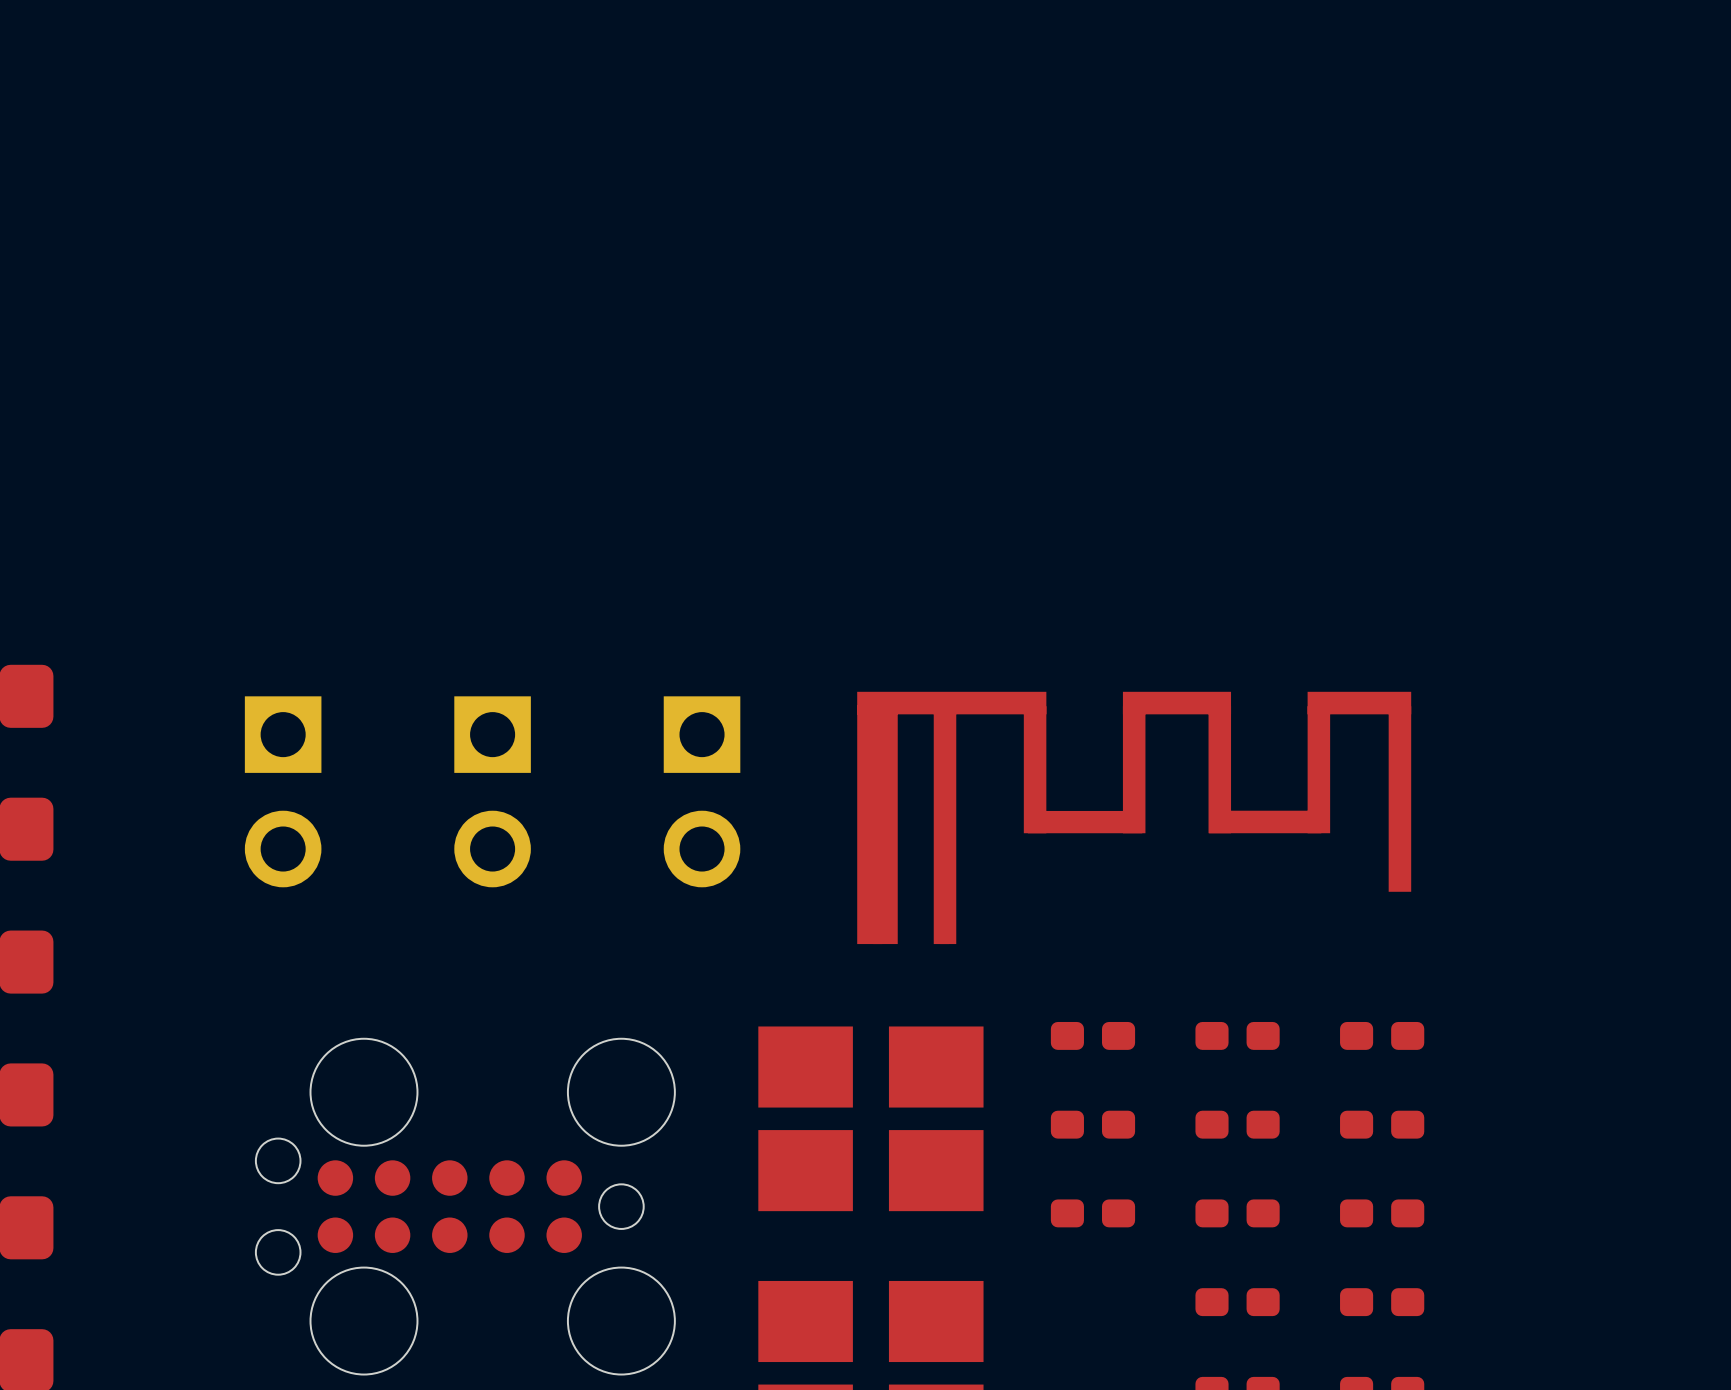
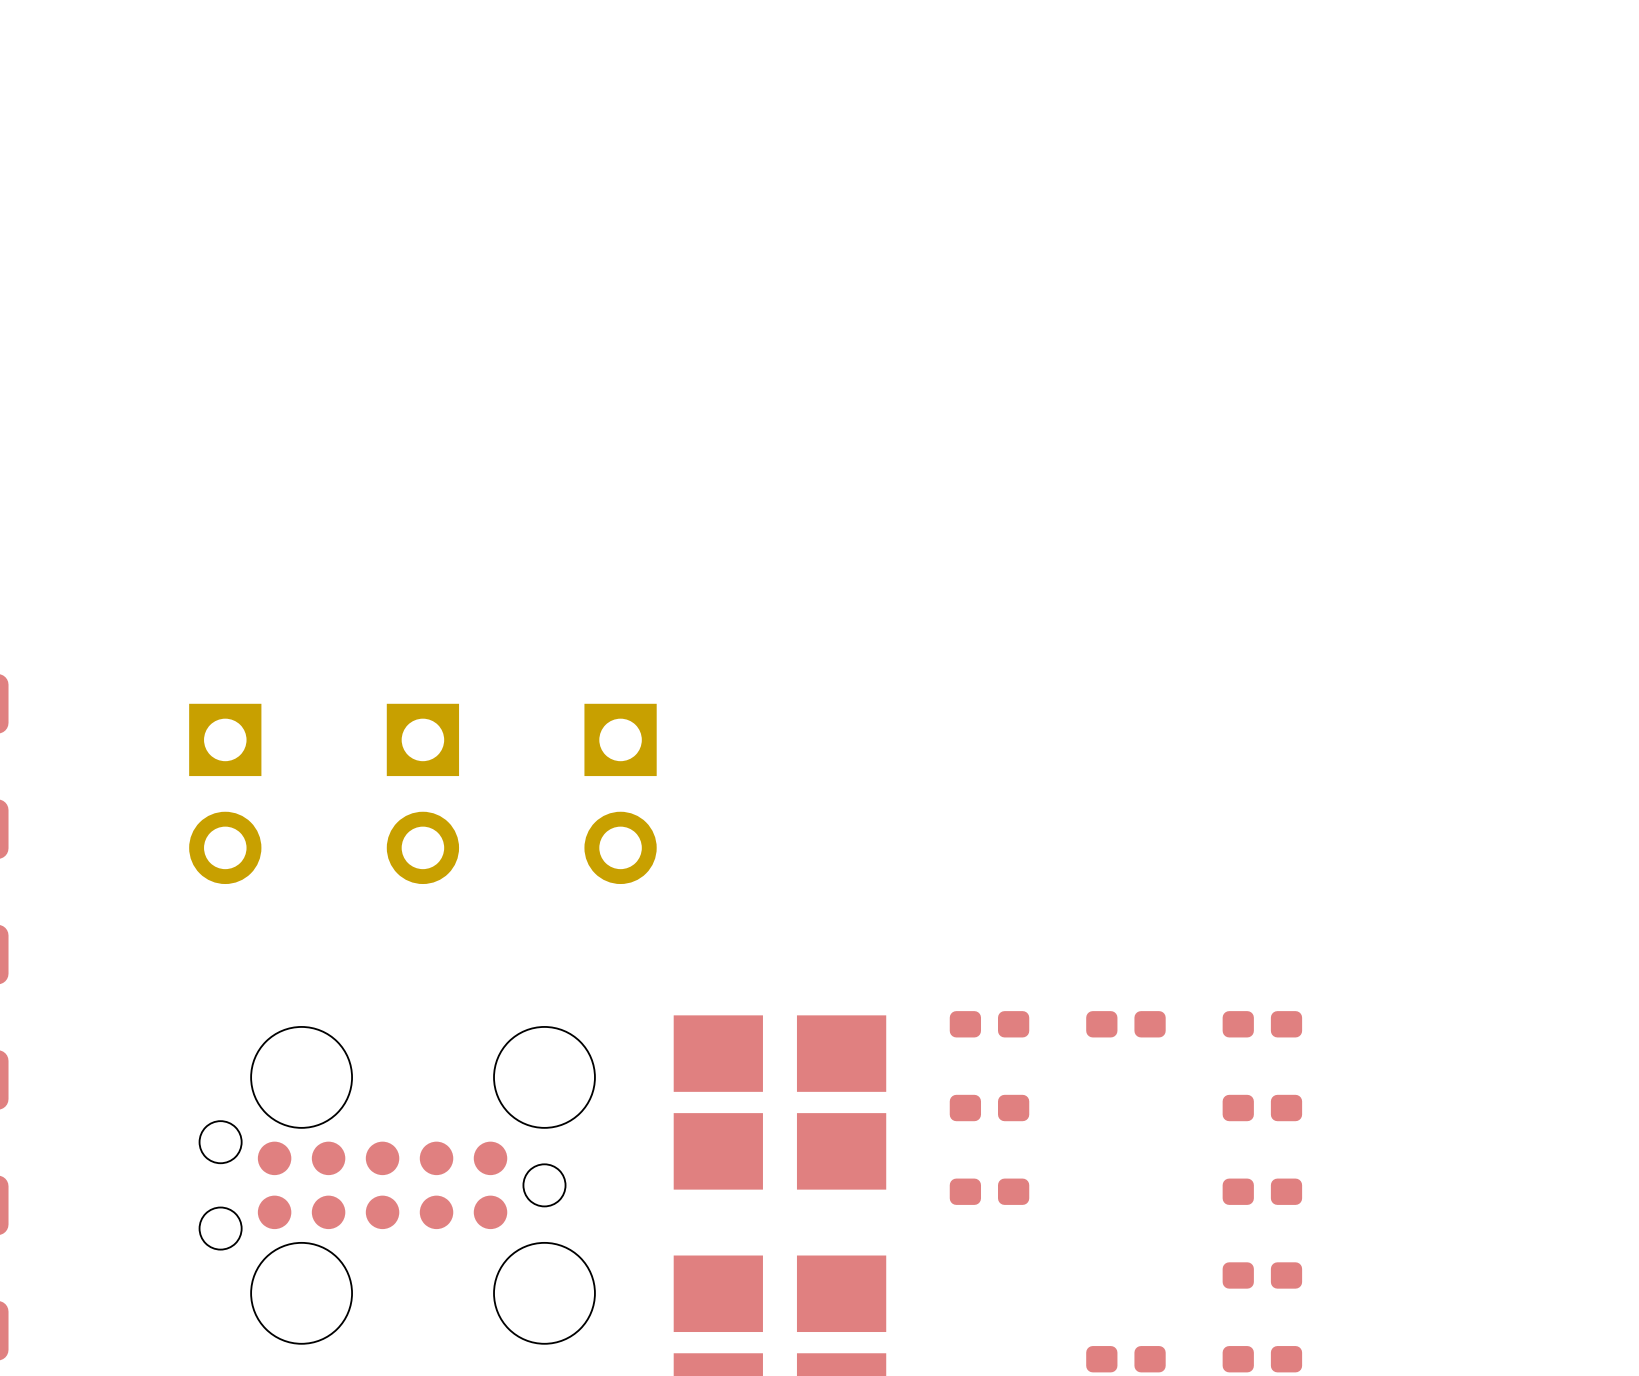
part: (1134, 817) -> none
part: (1237, 1124) -> none
part: (1237, 1213) -> none
part: (1237, 1302) -> none

